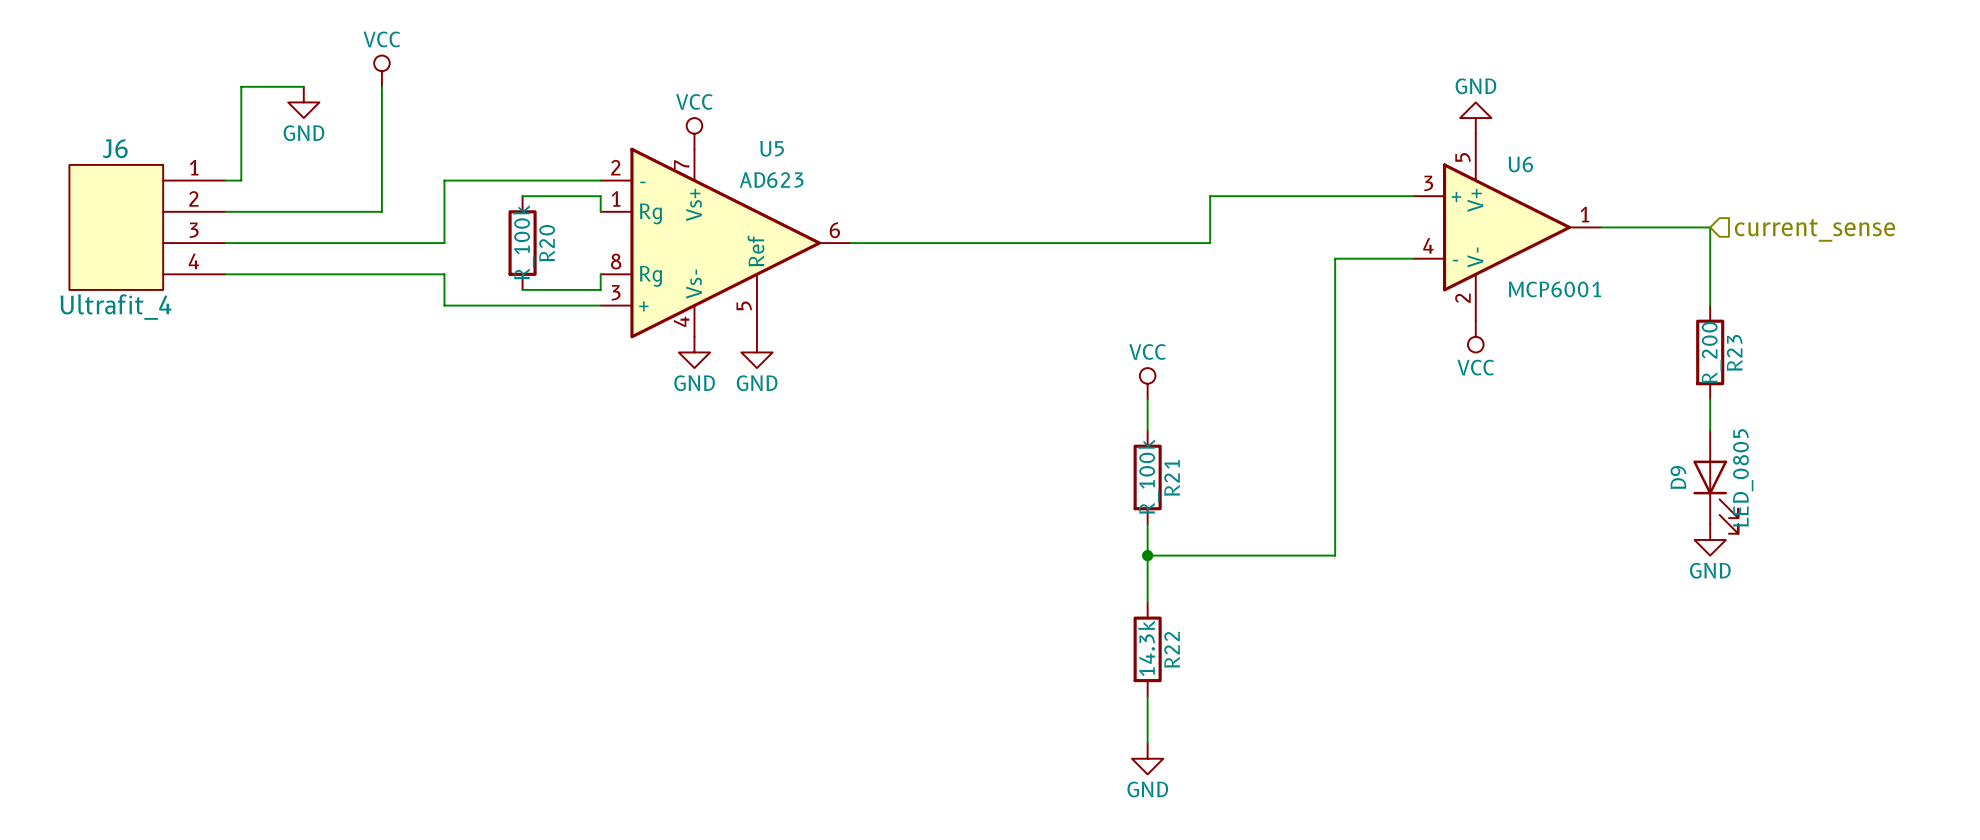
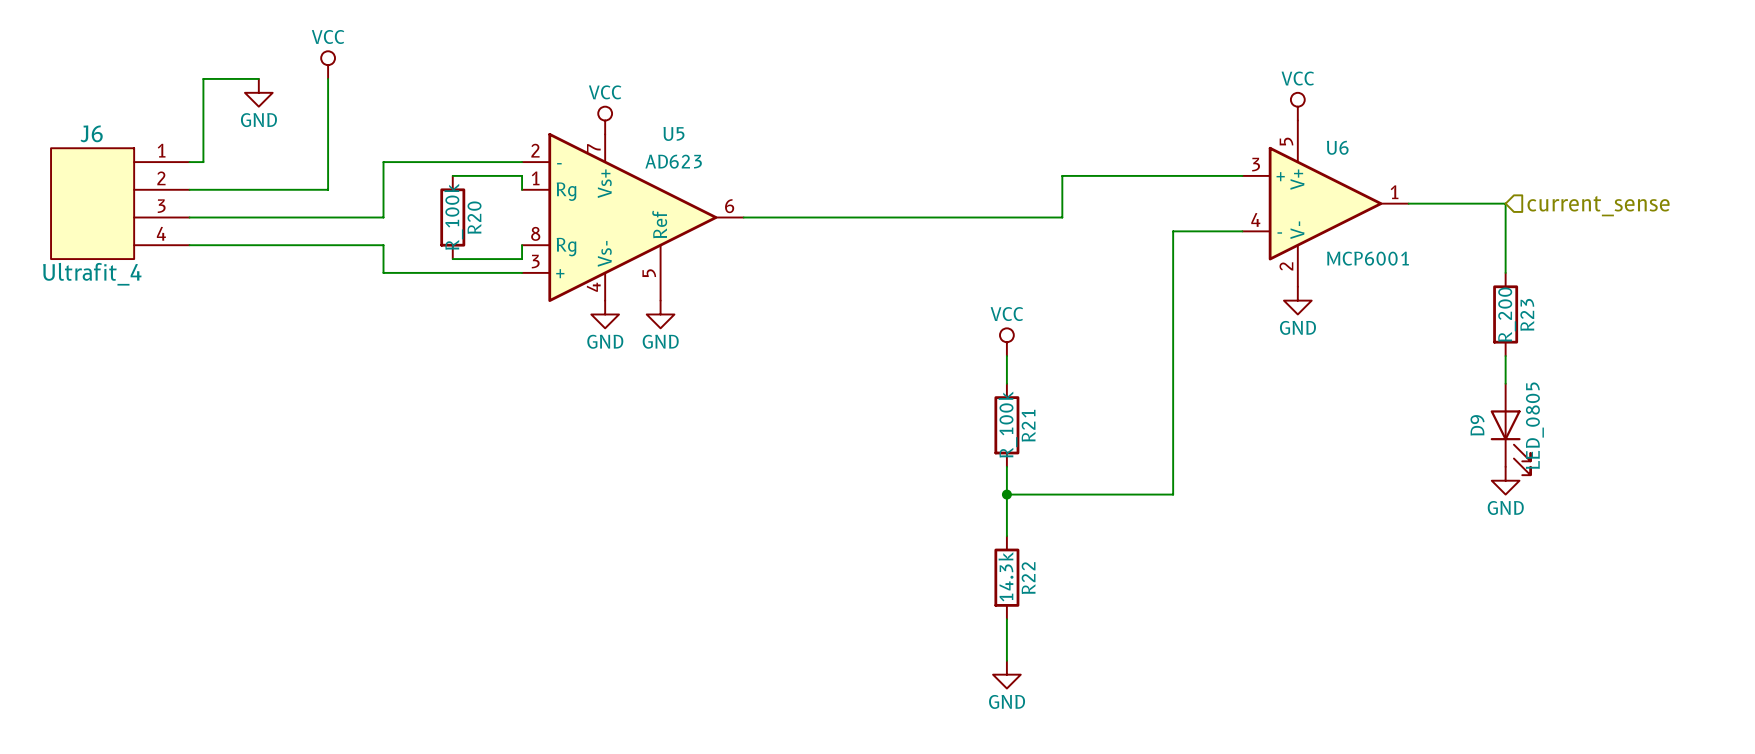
power symbol: GND (1475, 118) -> VCC (1297, 106)
power symbol: VCC (1475, 336) -> GND (1297, 300)

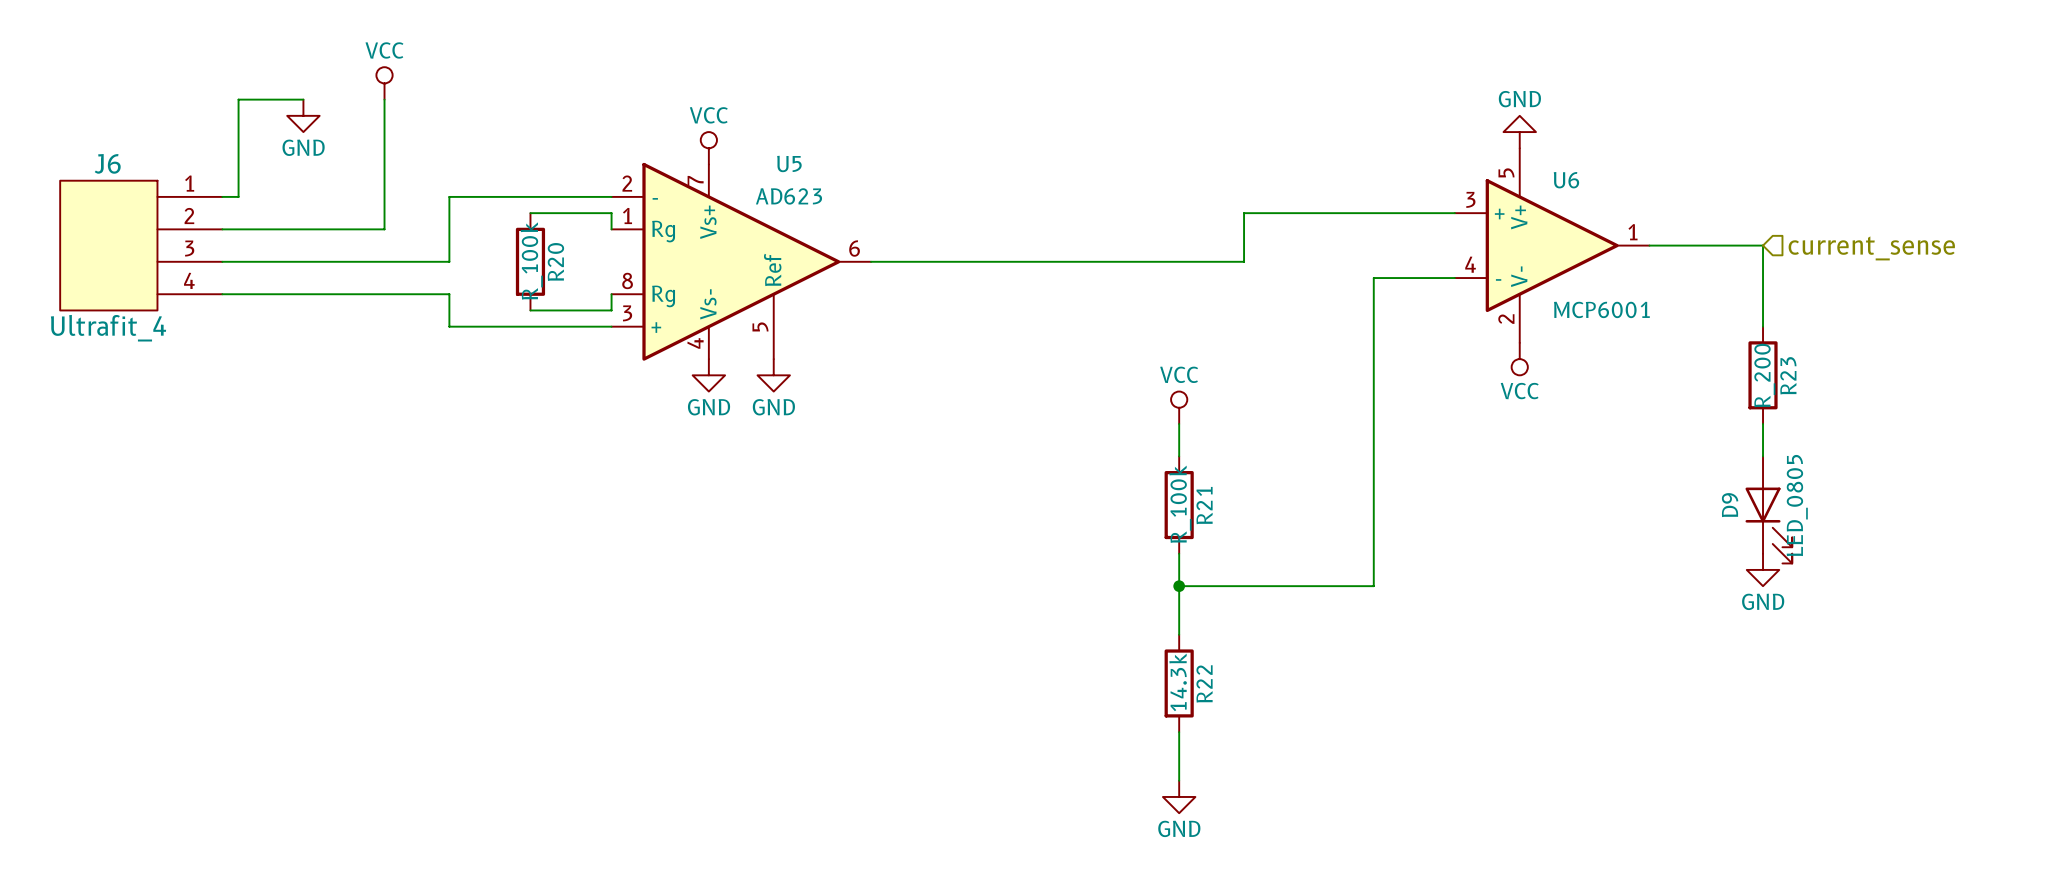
power symbol: VCC (1297, 106) -> GND (1519, 132)
power symbol: GND (1297, 300) -> VCC (1519, 359)

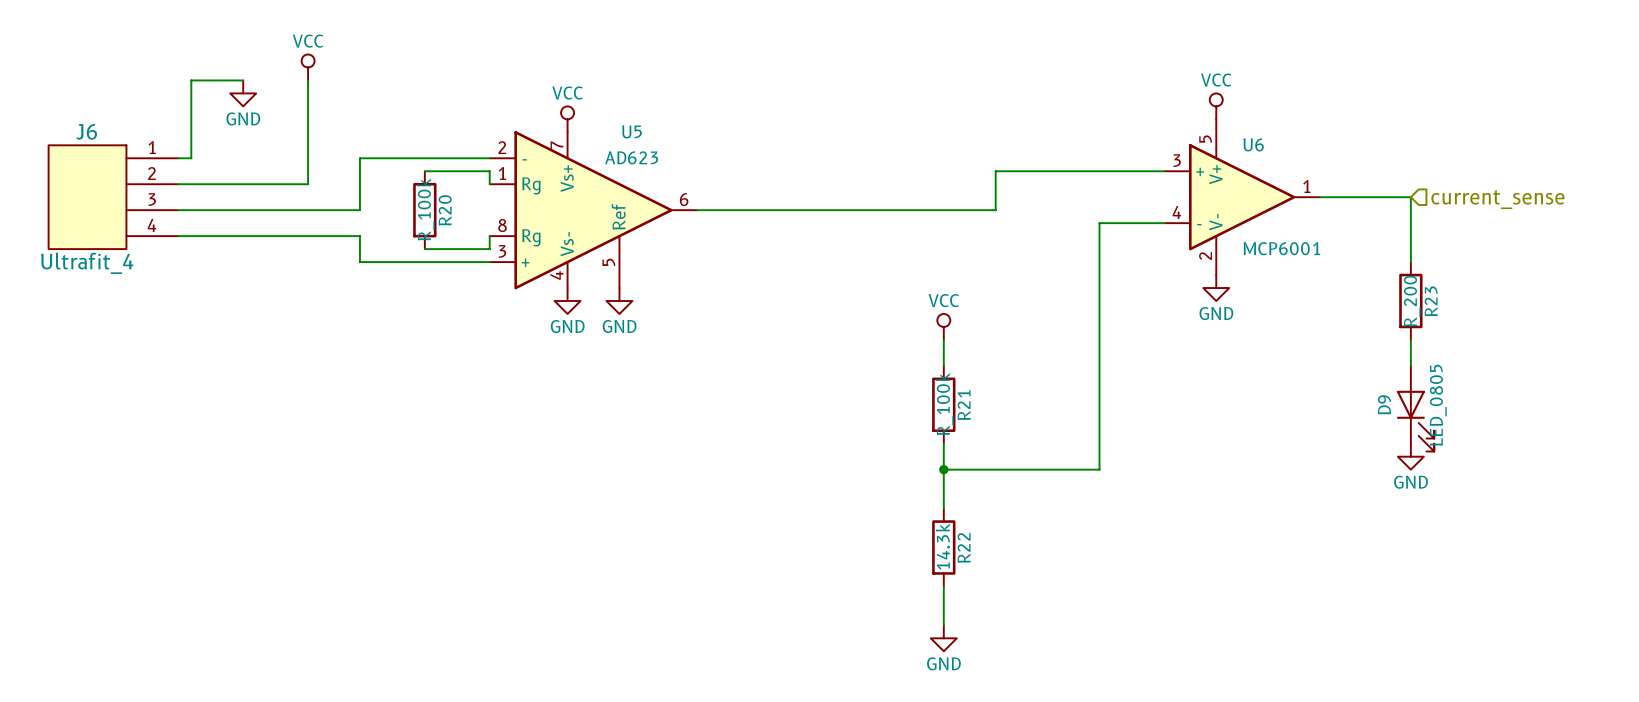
power symbol: GND (1519, 132) -> VCC (1216, 106)
power symbol: VCC (1519, 359) -> GND (1216, 288)

